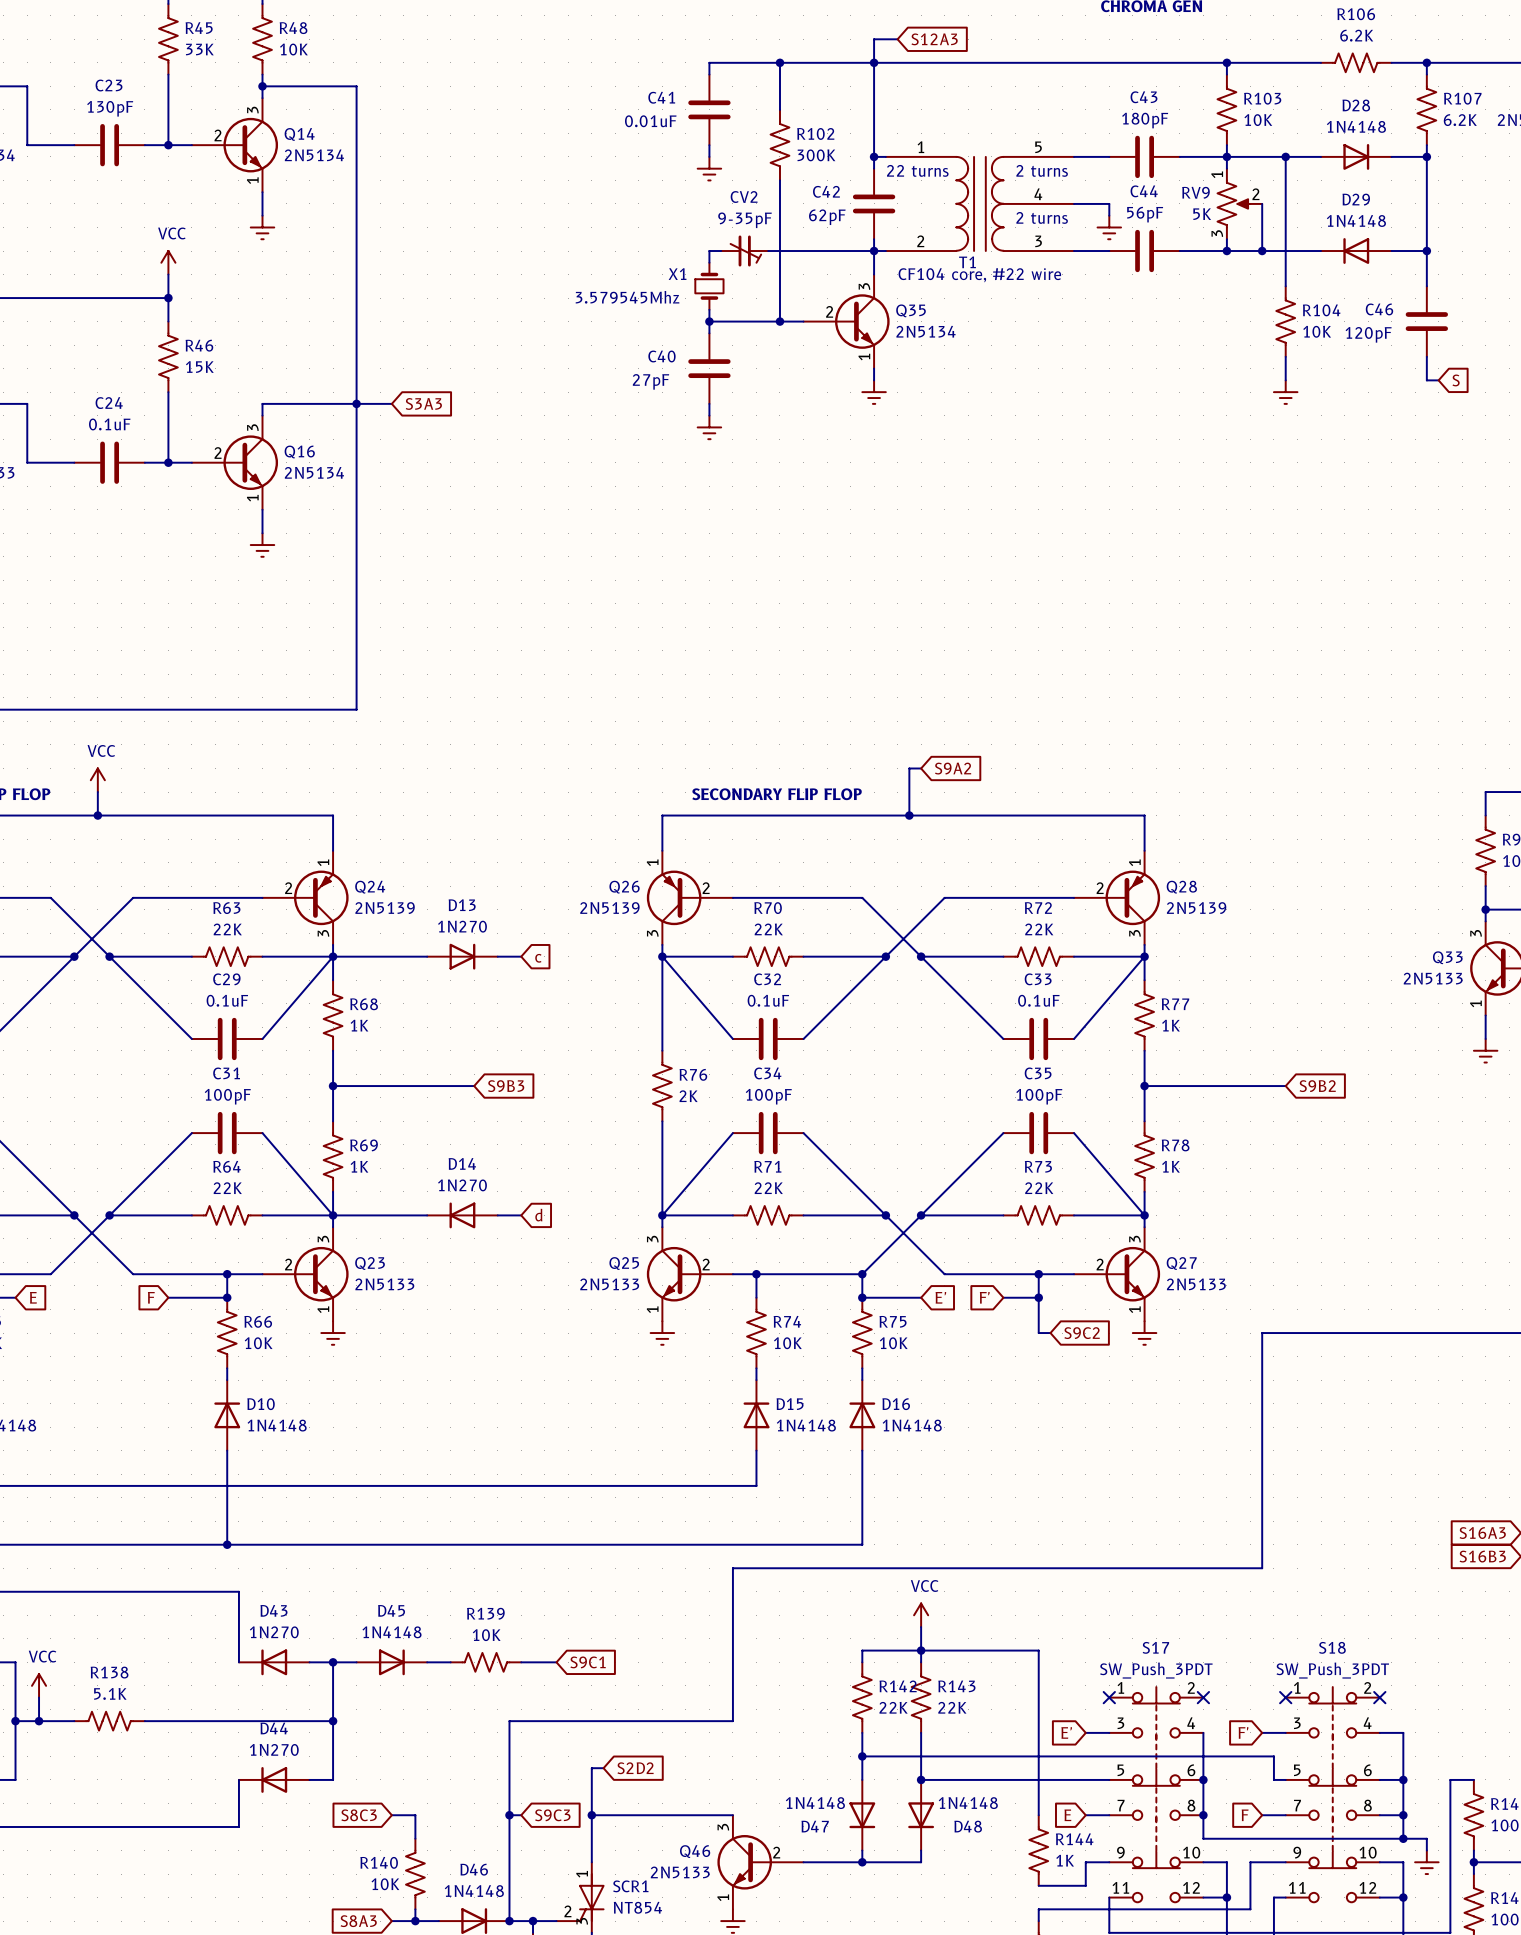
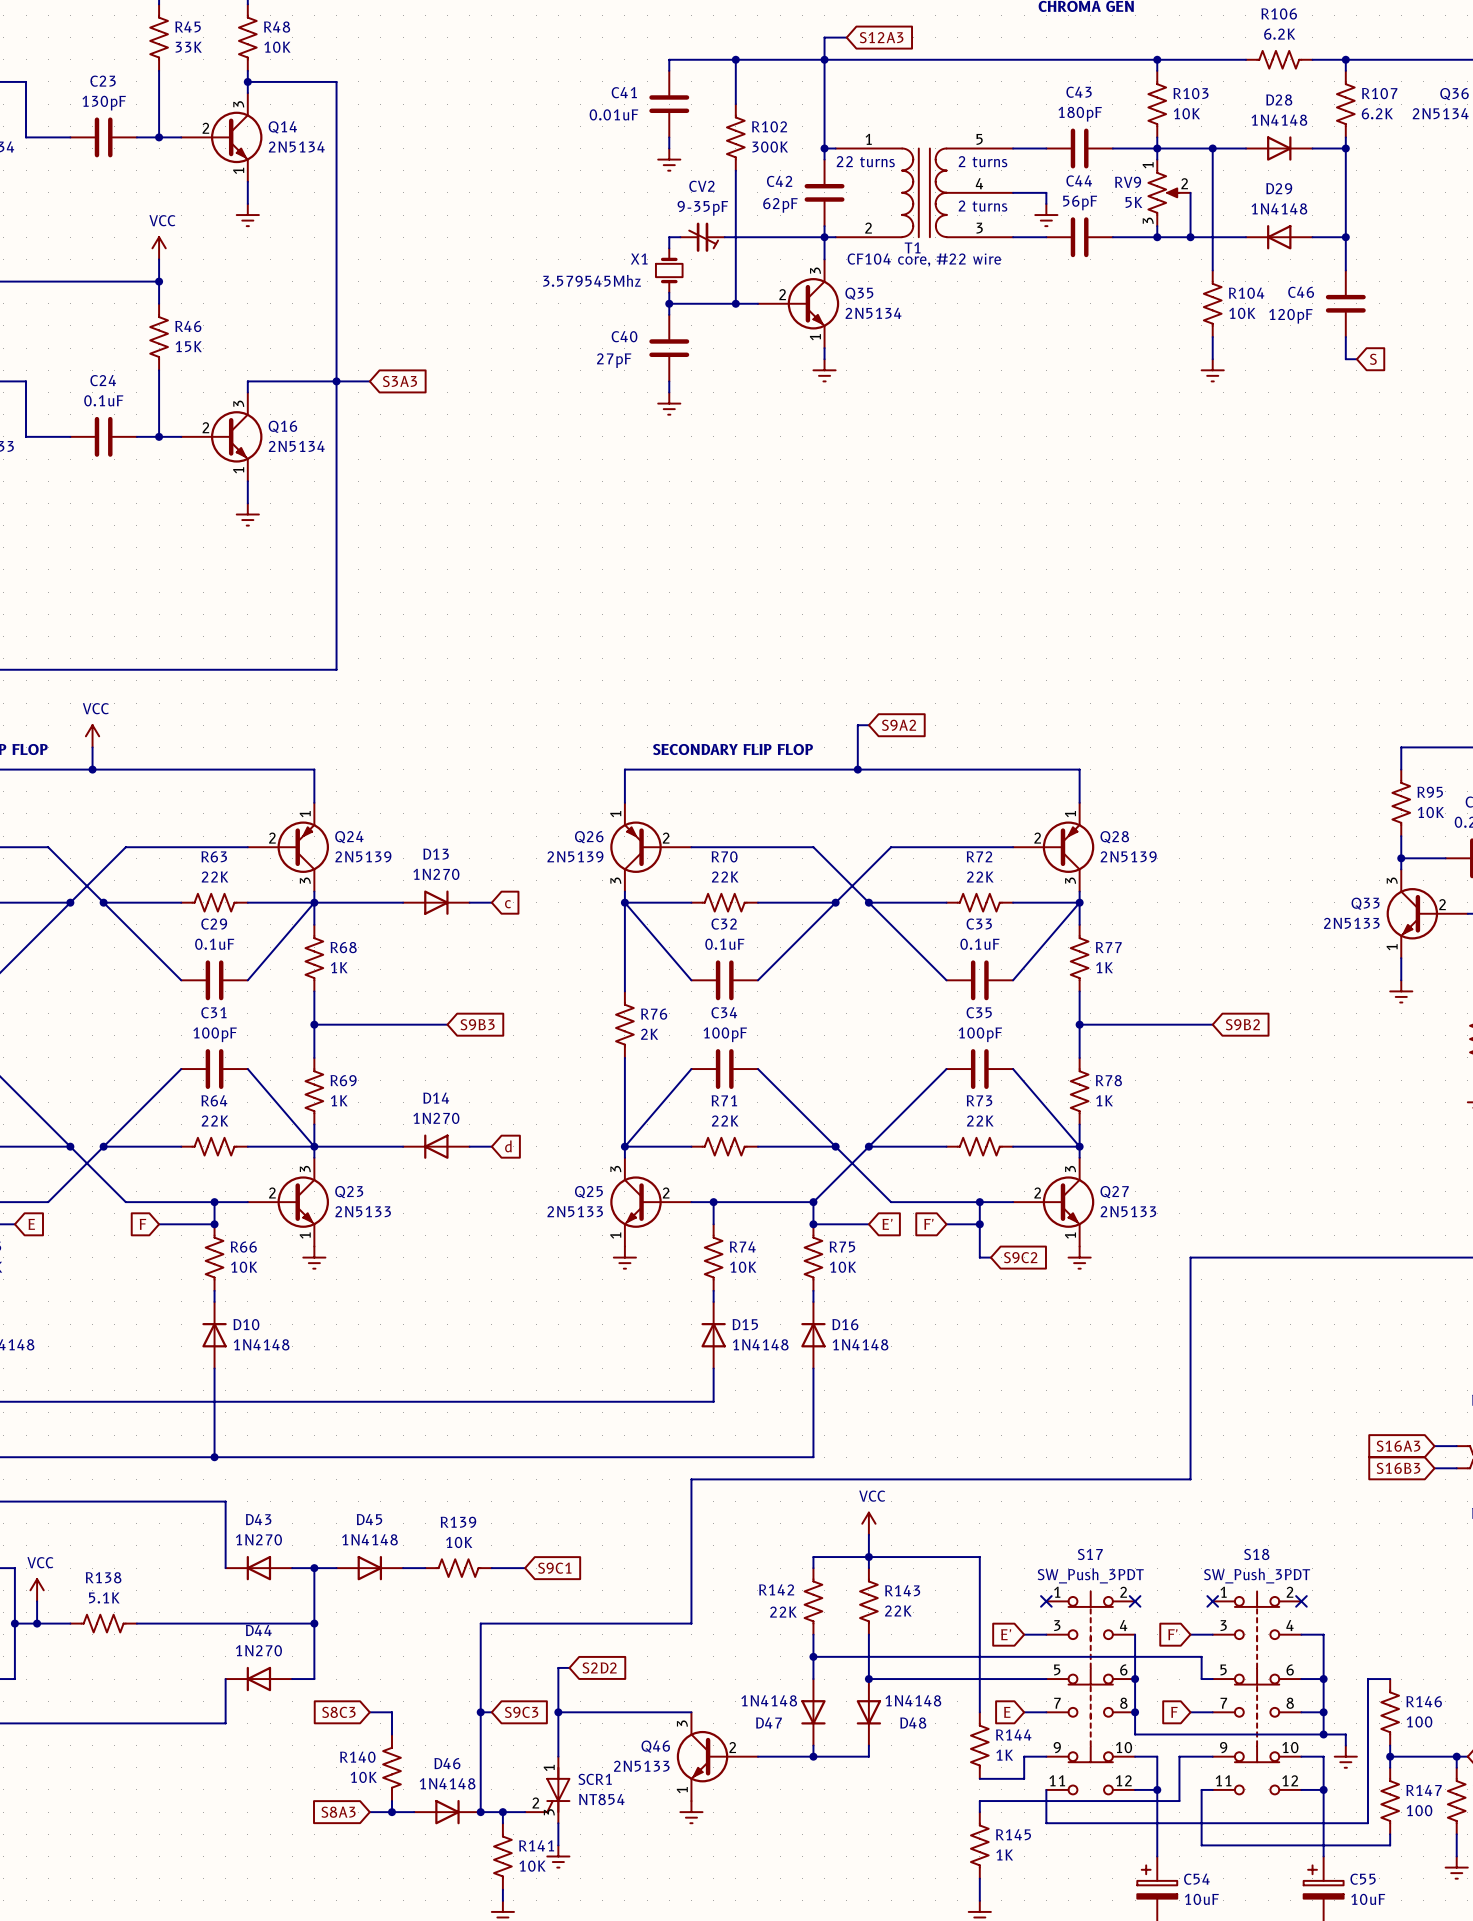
R142 name position: R142 (898, 1686) -> R142 (776, 1589)
R142 value position: 22K (893, 1707) -> 22K (783, 1612)

